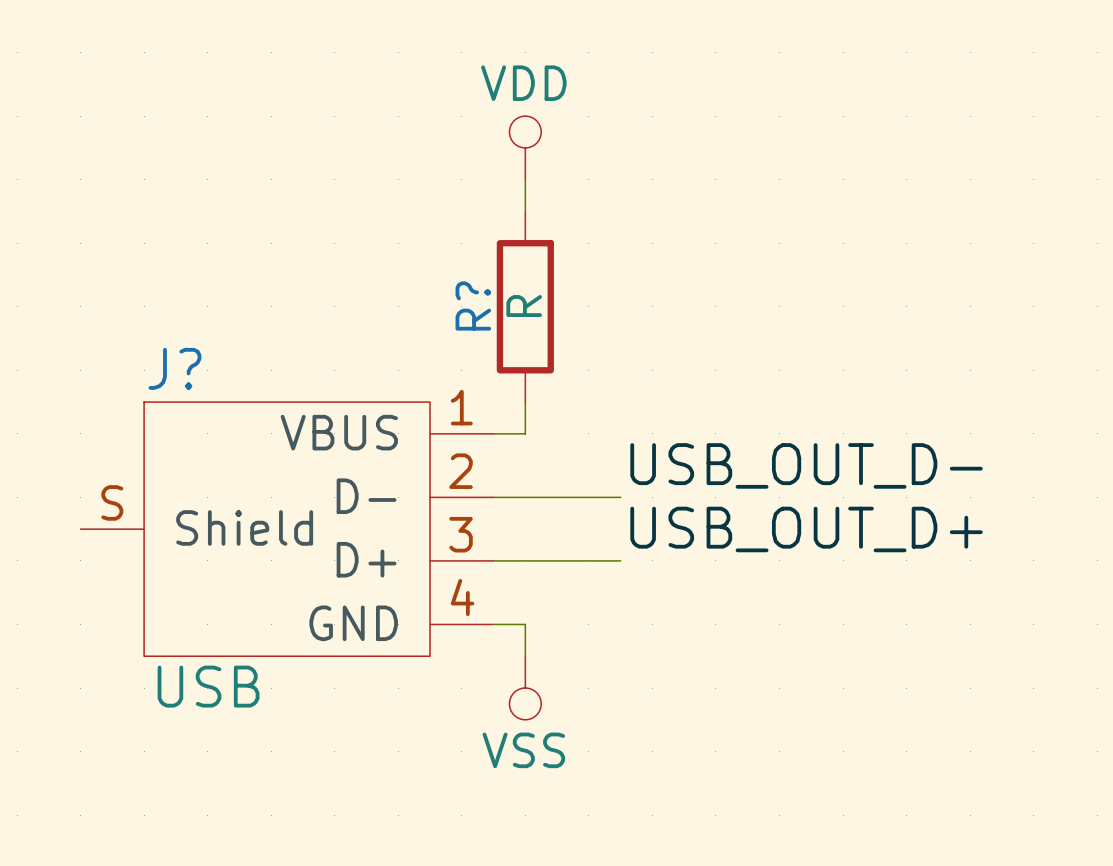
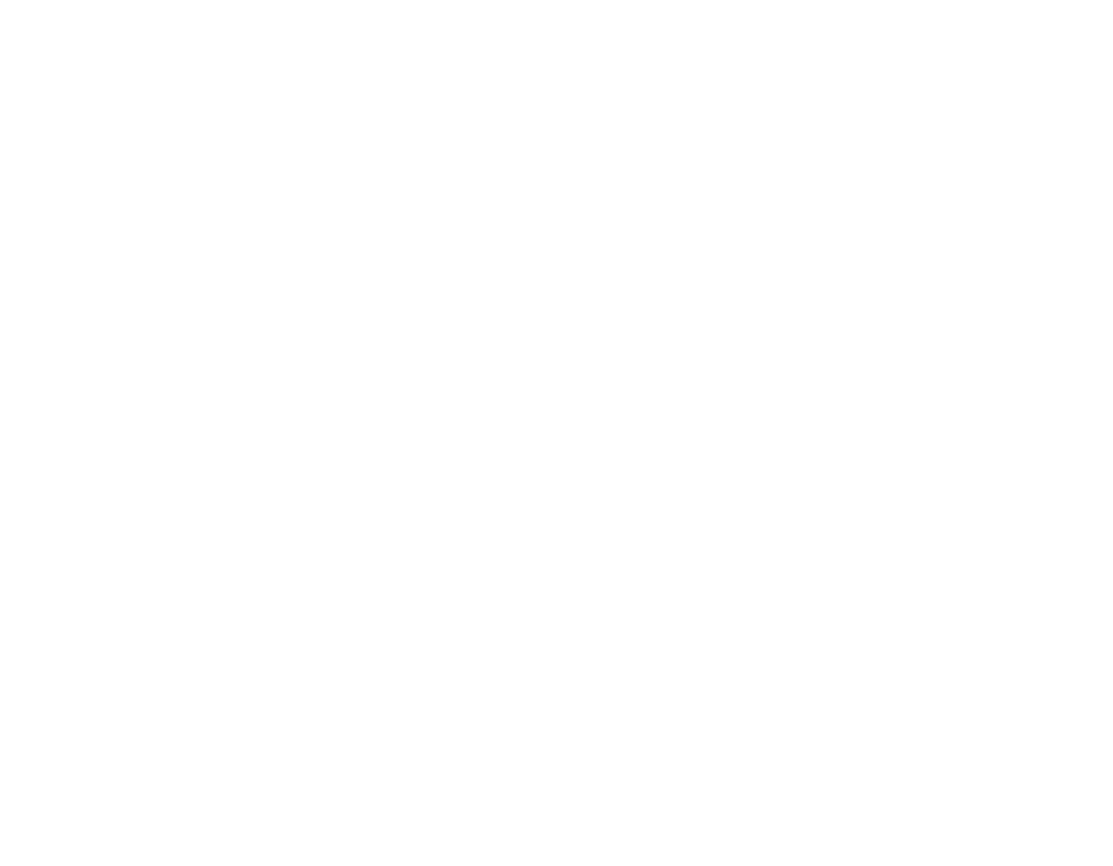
power symbol: VDD (525, 147) -> none
wire: (525, 179) (525, 211) -> none
R?: R (525, 306) -> none
wire: (525, 402) (525, 433) (493, 433) -> none
label: USB_OUT_D- (806, 465) -> none
wire: (493, 497) (620, 497) -> none
J?: USB (287, 529) -> none
label: USB_OUT_D+ (806, 529) -> none
wire: (493, 560) (620, 560) -> none
wire: (493, 624) (525, 624) (525, 656) -> none
power symbol: VSS (525, 688) -> none

